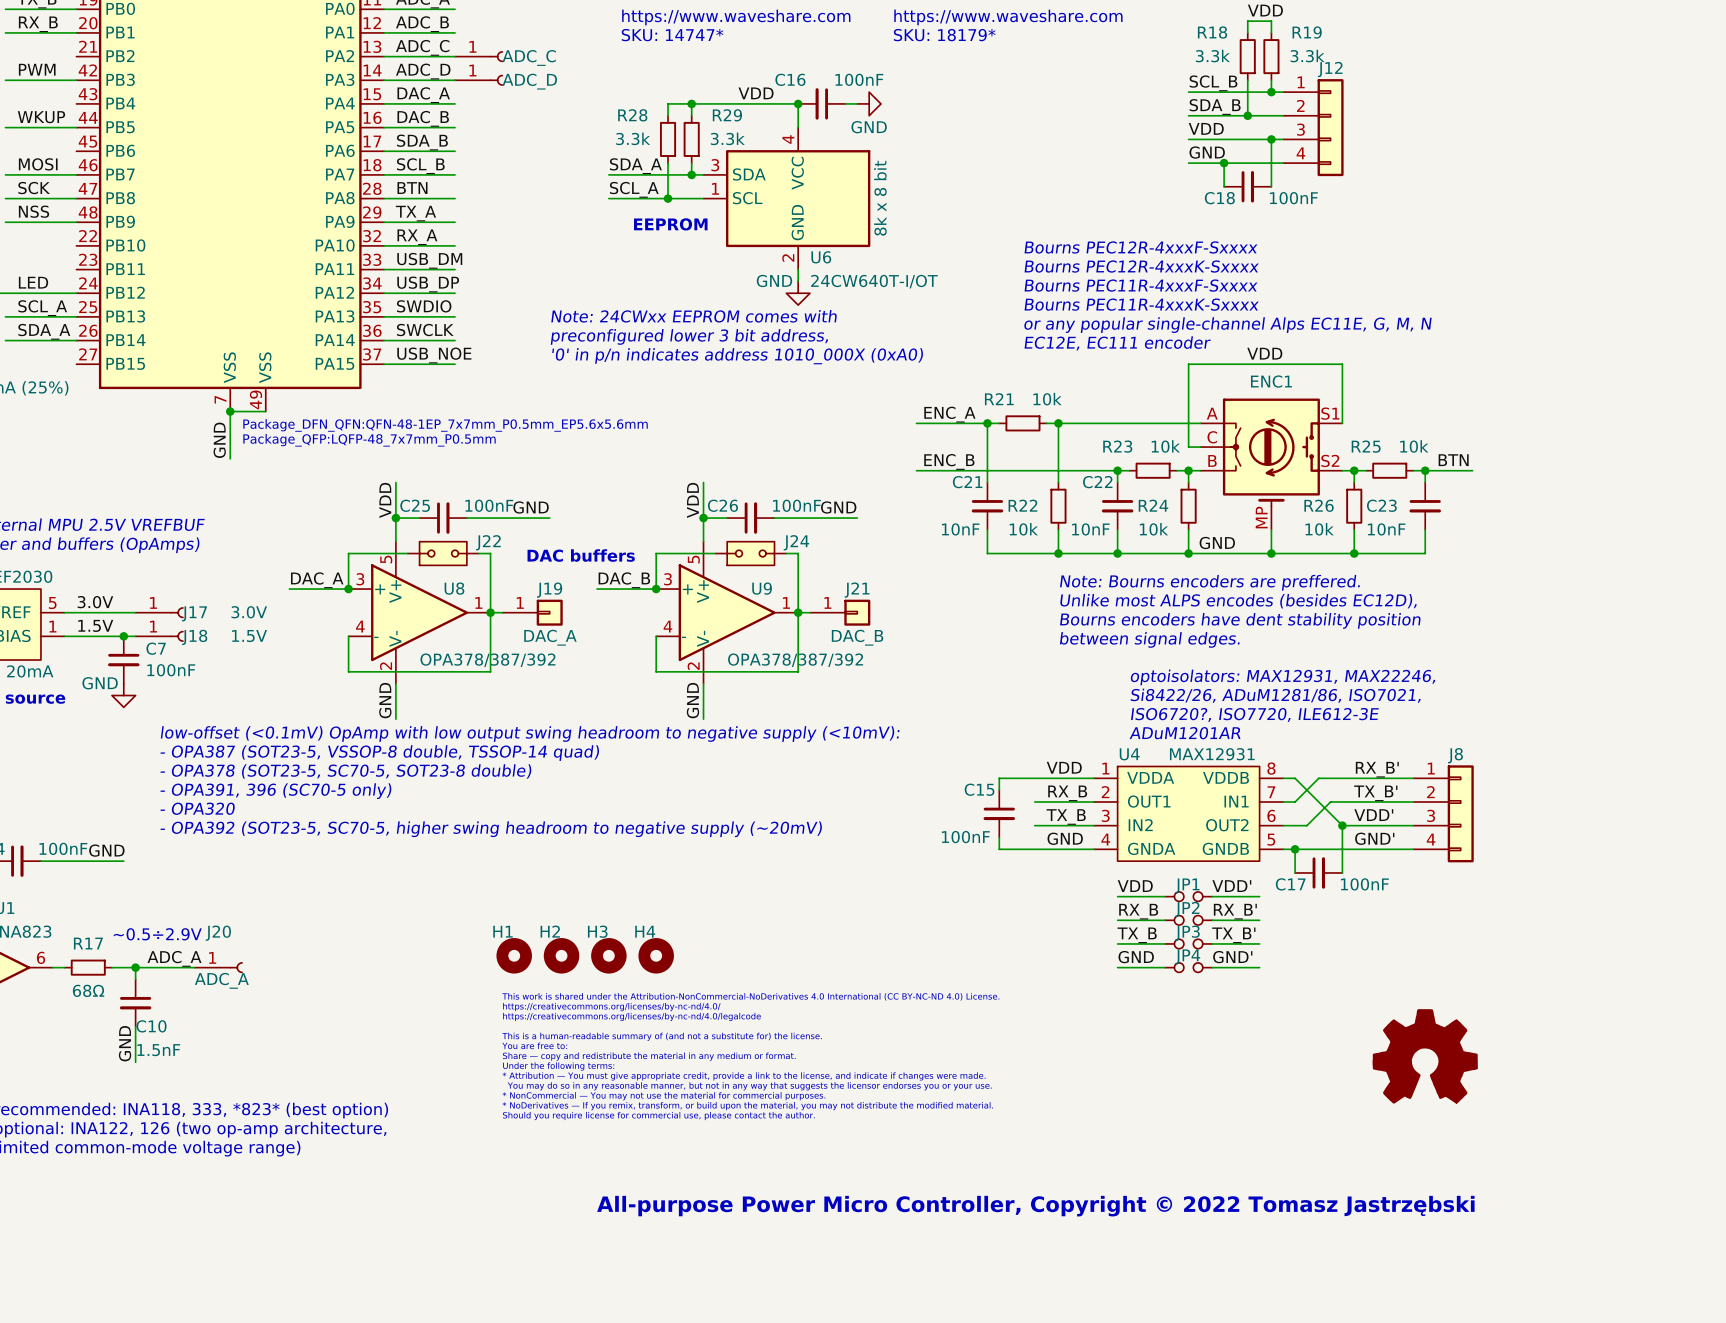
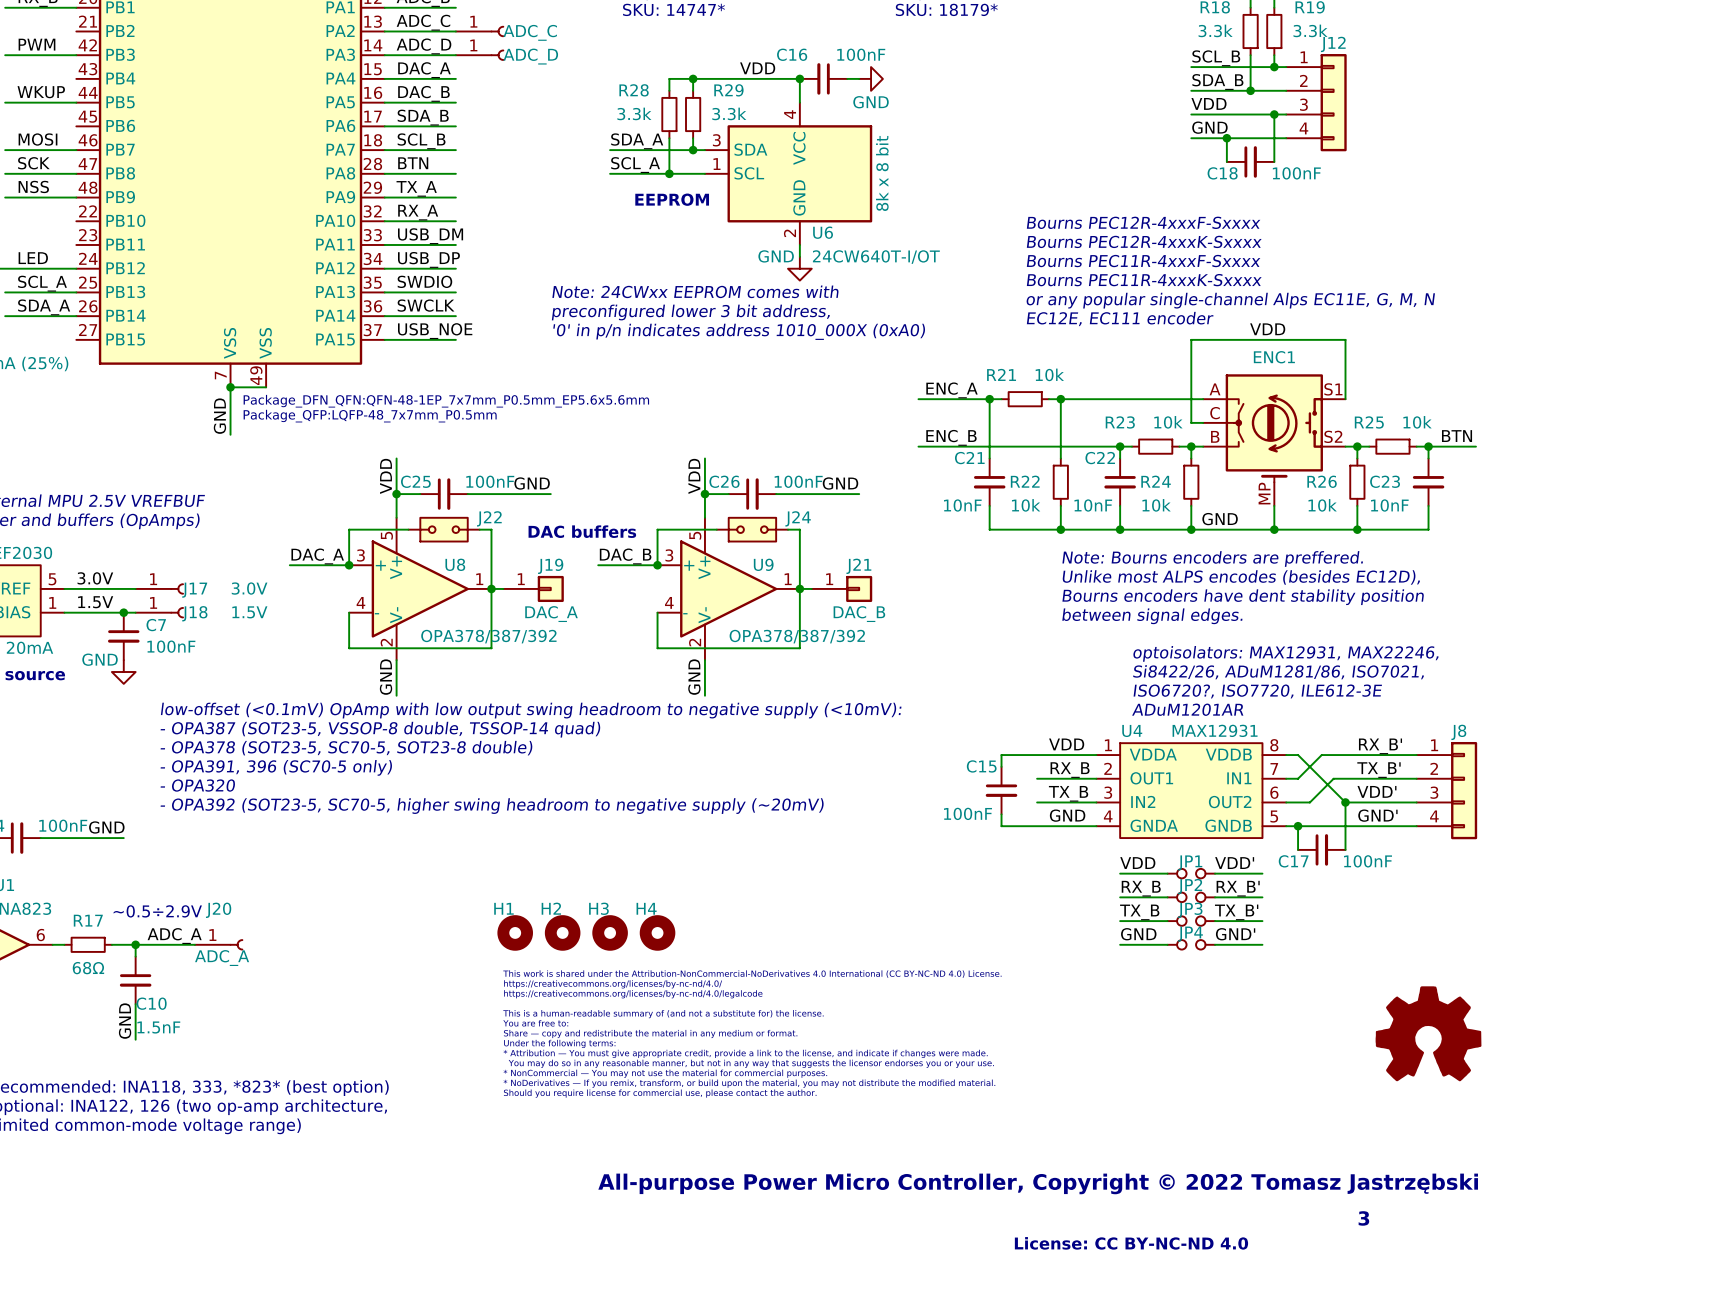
text: none -> 3 (1363, 1218)
text: none -> License: CC BY-NC-ND 4.0 (1131, 1243)

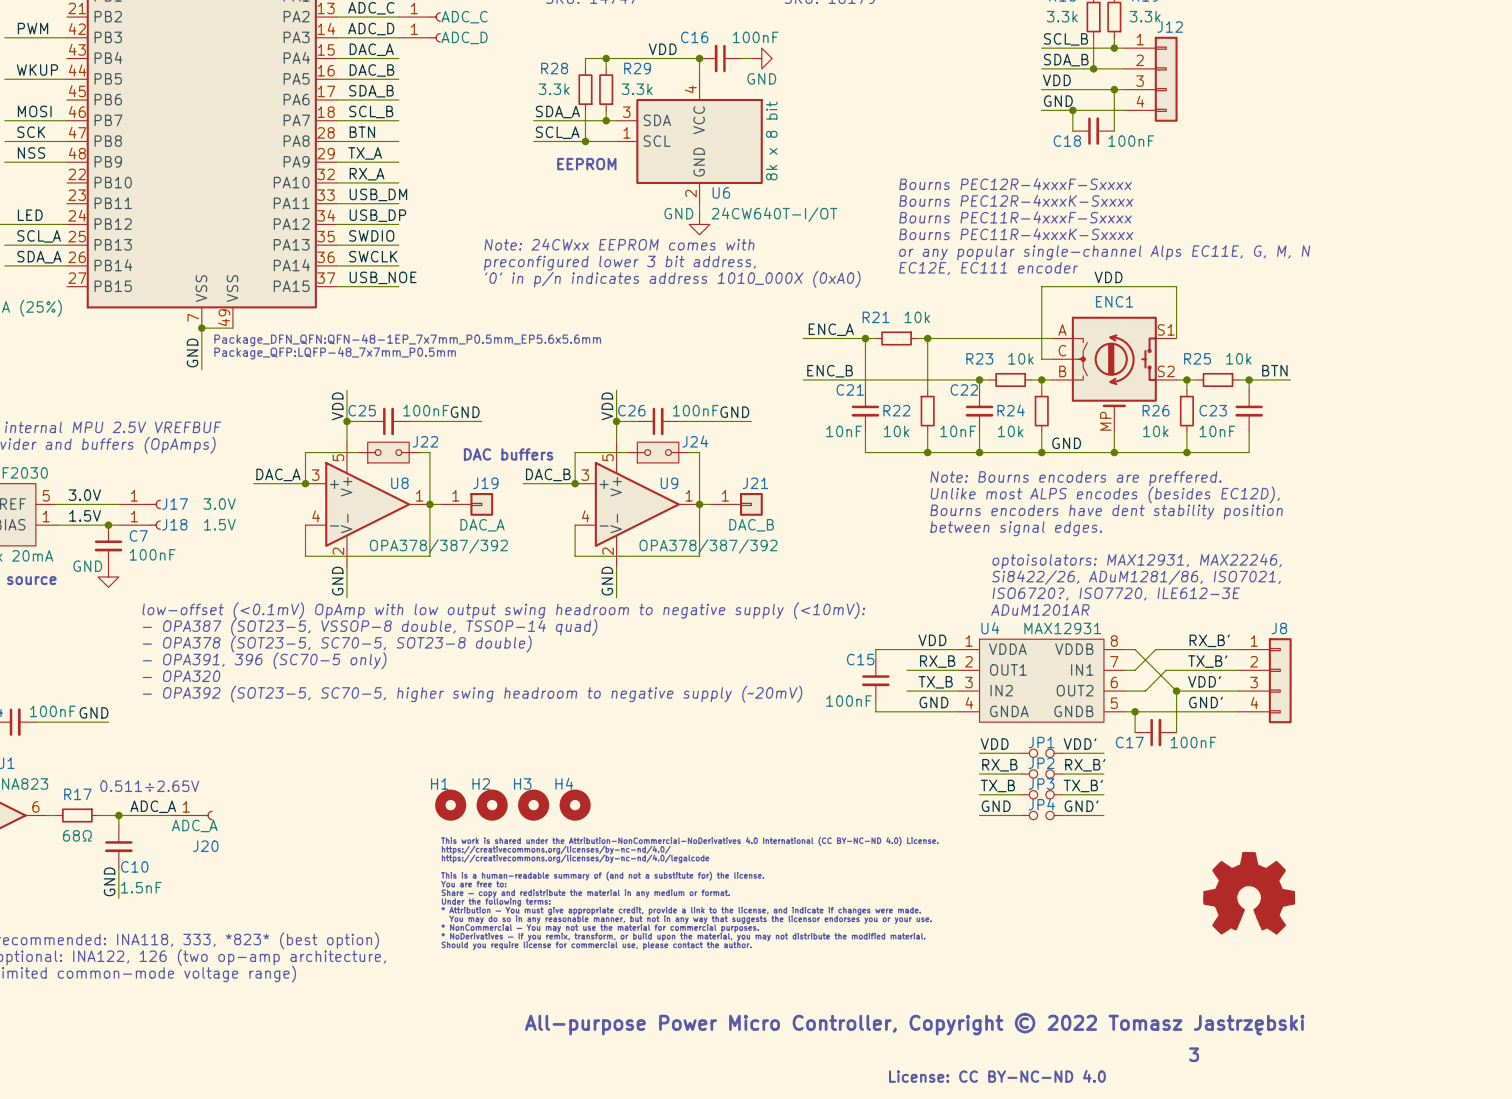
J20 name position: J20 (218, 910) -> J20 (205, 846)
text: ~0.5÷2.9V (157, 911) -> 0.511÷2.65V (149, 786)

